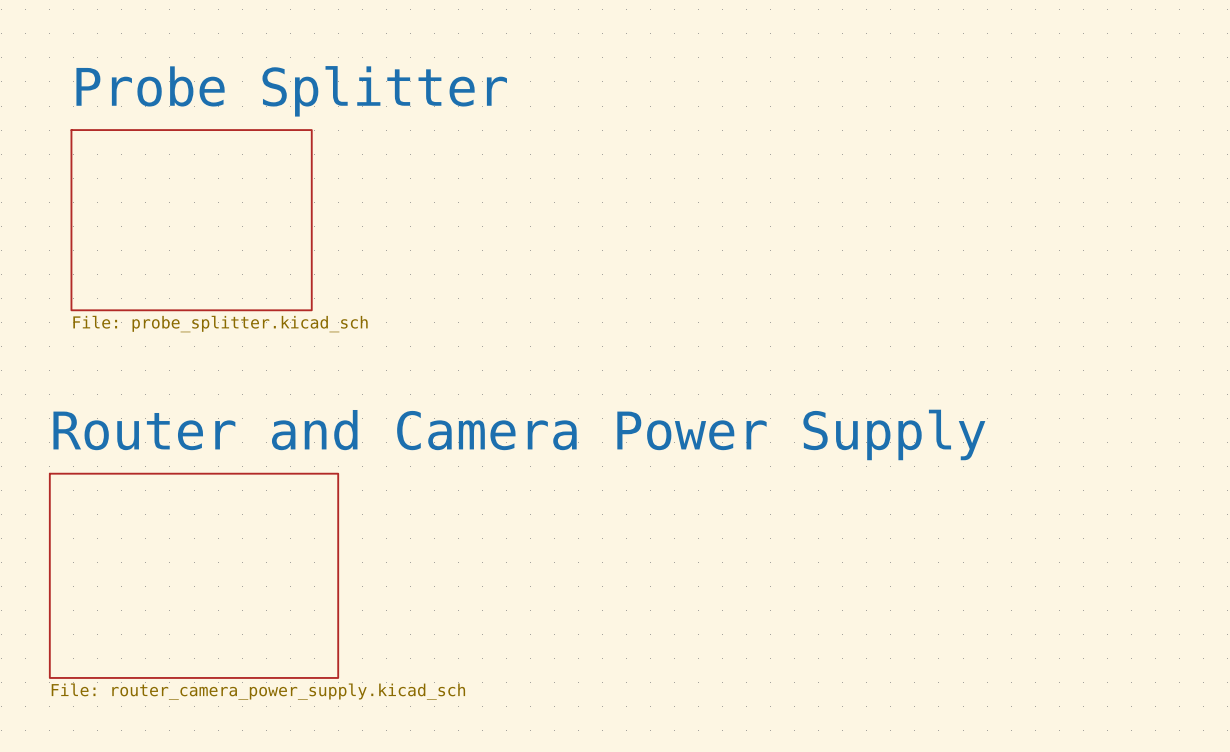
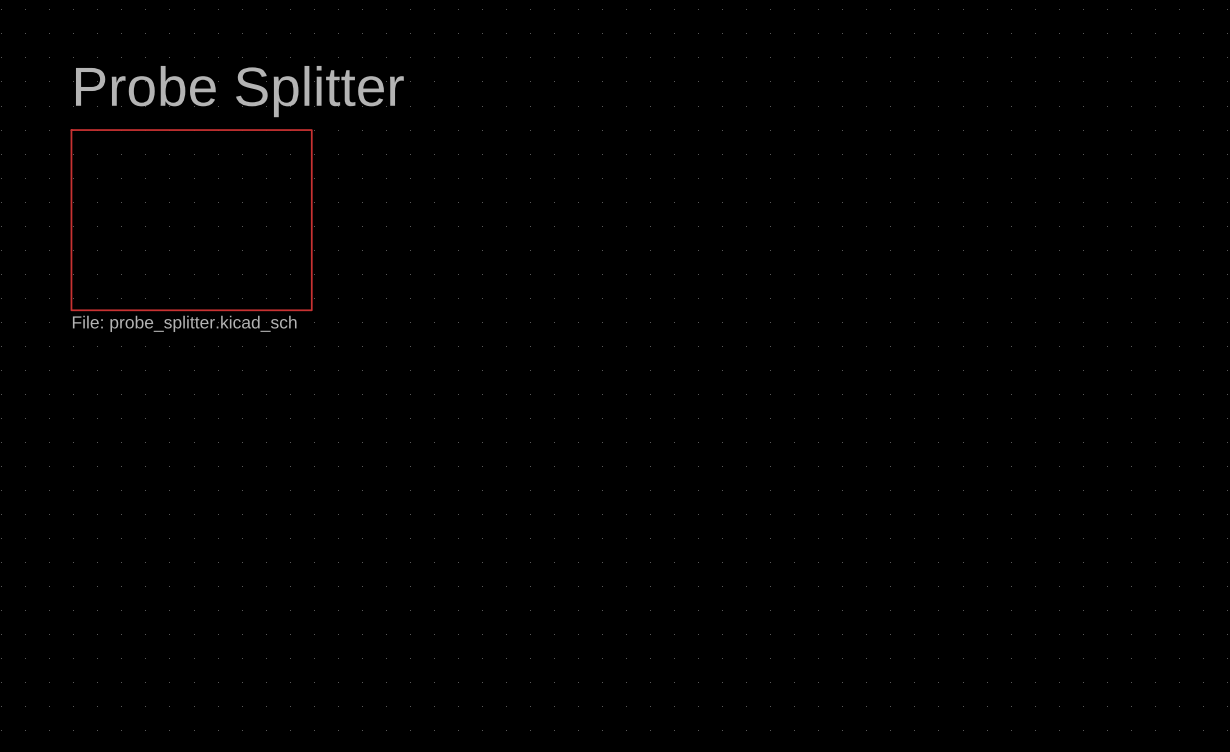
sheet Router and Camera Power Supply: File: router_camera_power_supply.kicad_sch (194, 575) -> none

